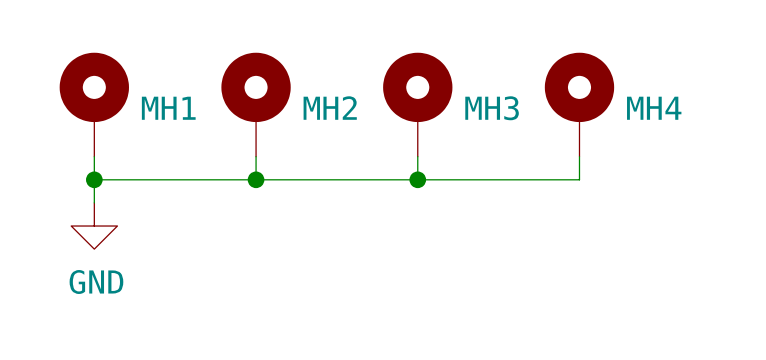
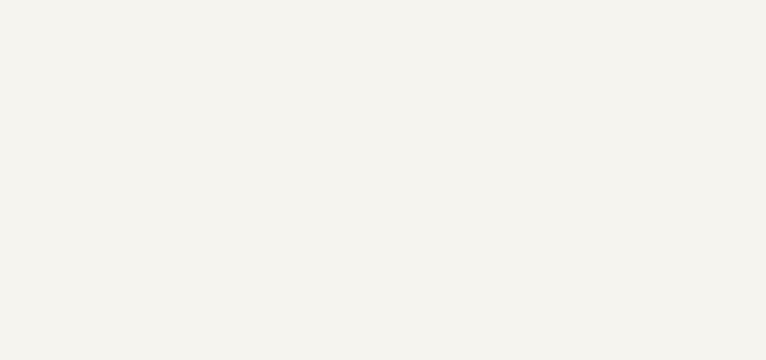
MH1: (94, 104) -> none
MH2: (256, 104) -> none
MH3: (417, 104) -> none
MH4: (579, 104) -> none
wire: (94, 156) (94, 202) -> none
wire: (256, 156) (256, 179) -> none
wire: (417, 156) (417, 179) -> none
wire: (579, 156) (579, 179) (94, 179) -> none
junction: (94, 179) -> none
junction: (256, 179) -> none
junction: (417, 179) -> none
power symbol: GND (94, 226) -> none

